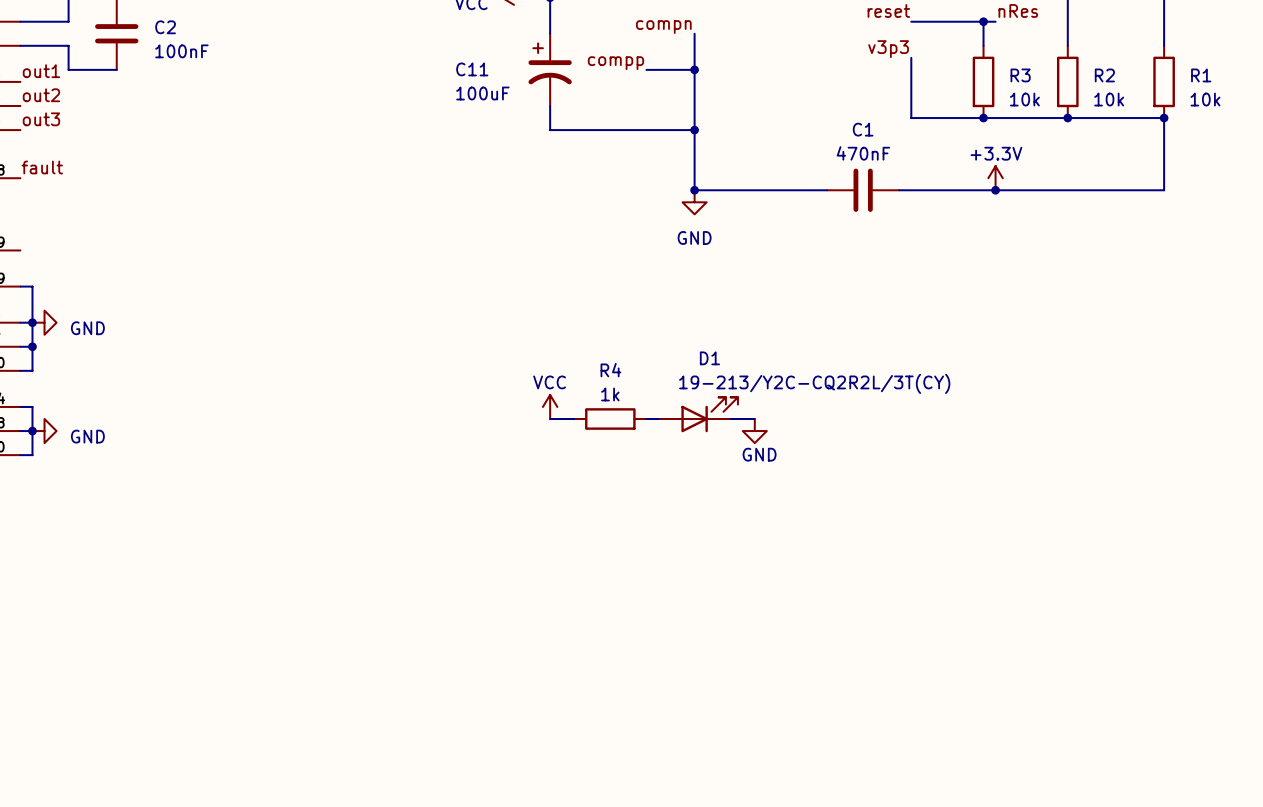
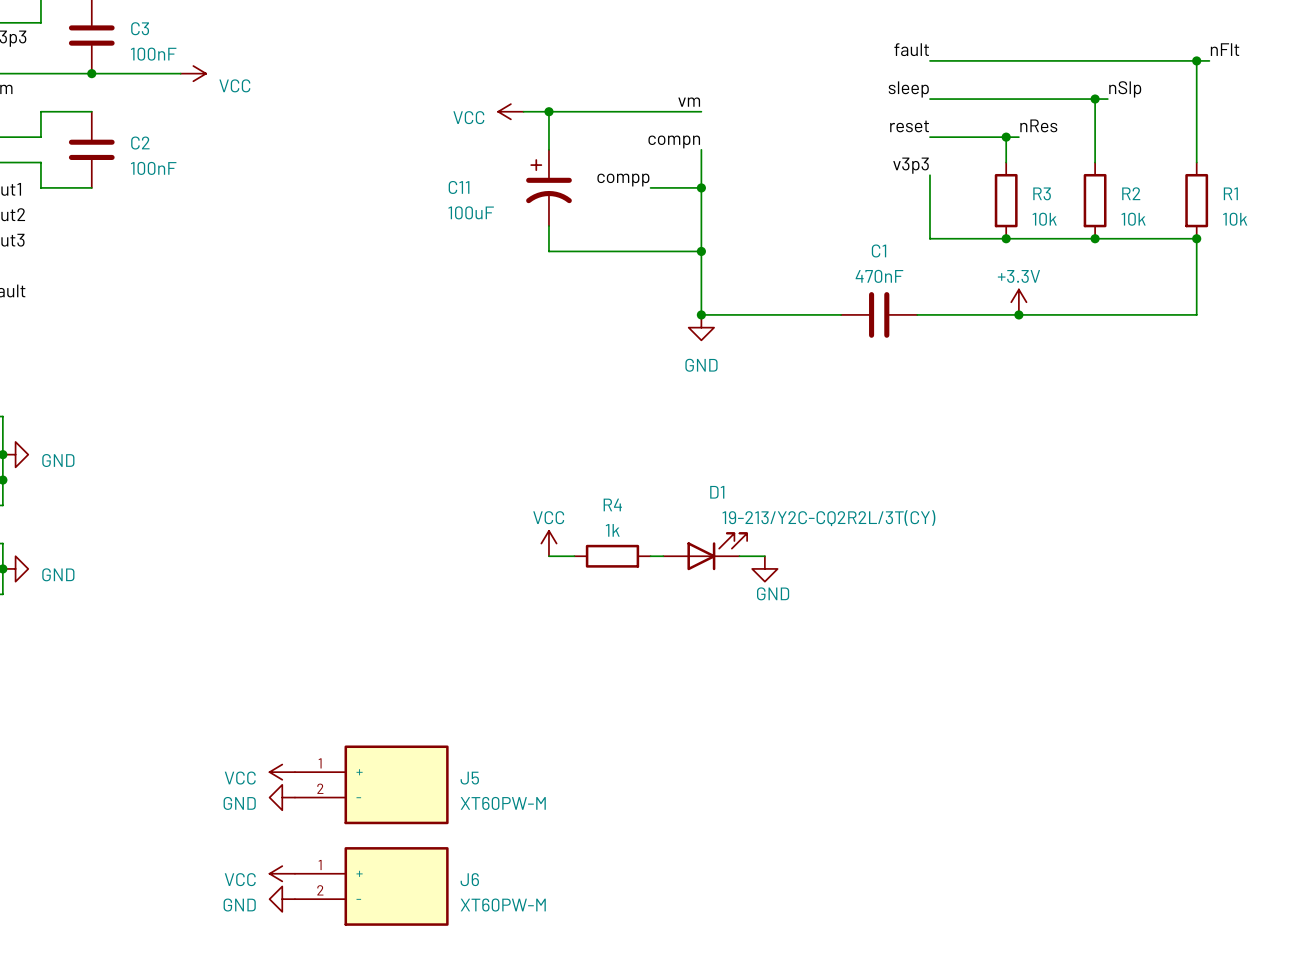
power symbol: none -> VCC (282, 772)
J5: none -> XT60PW-M (371, 784)
power symbol: none -> GND (282, 797)
power symbol: none -> VCC (282, 873)
J6: none -> XT60PW-M (371, 886)
power symbol: none -> GND (282, 899)

